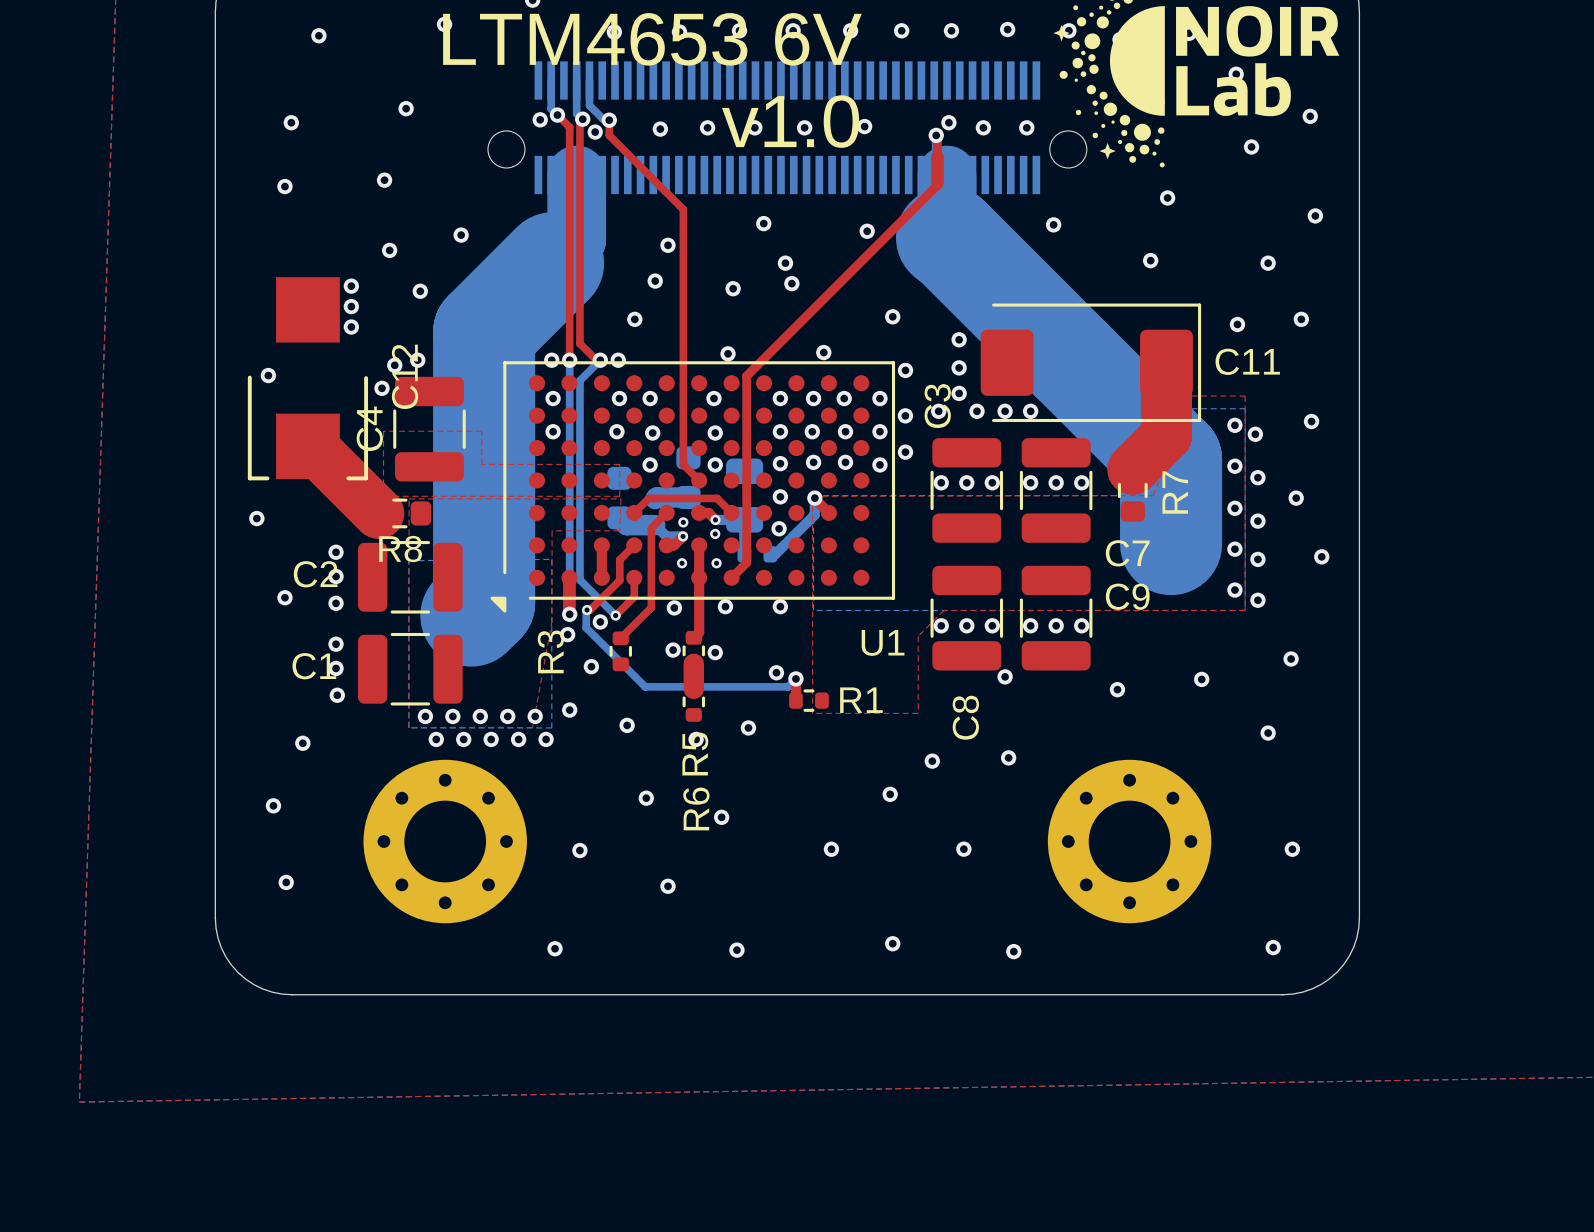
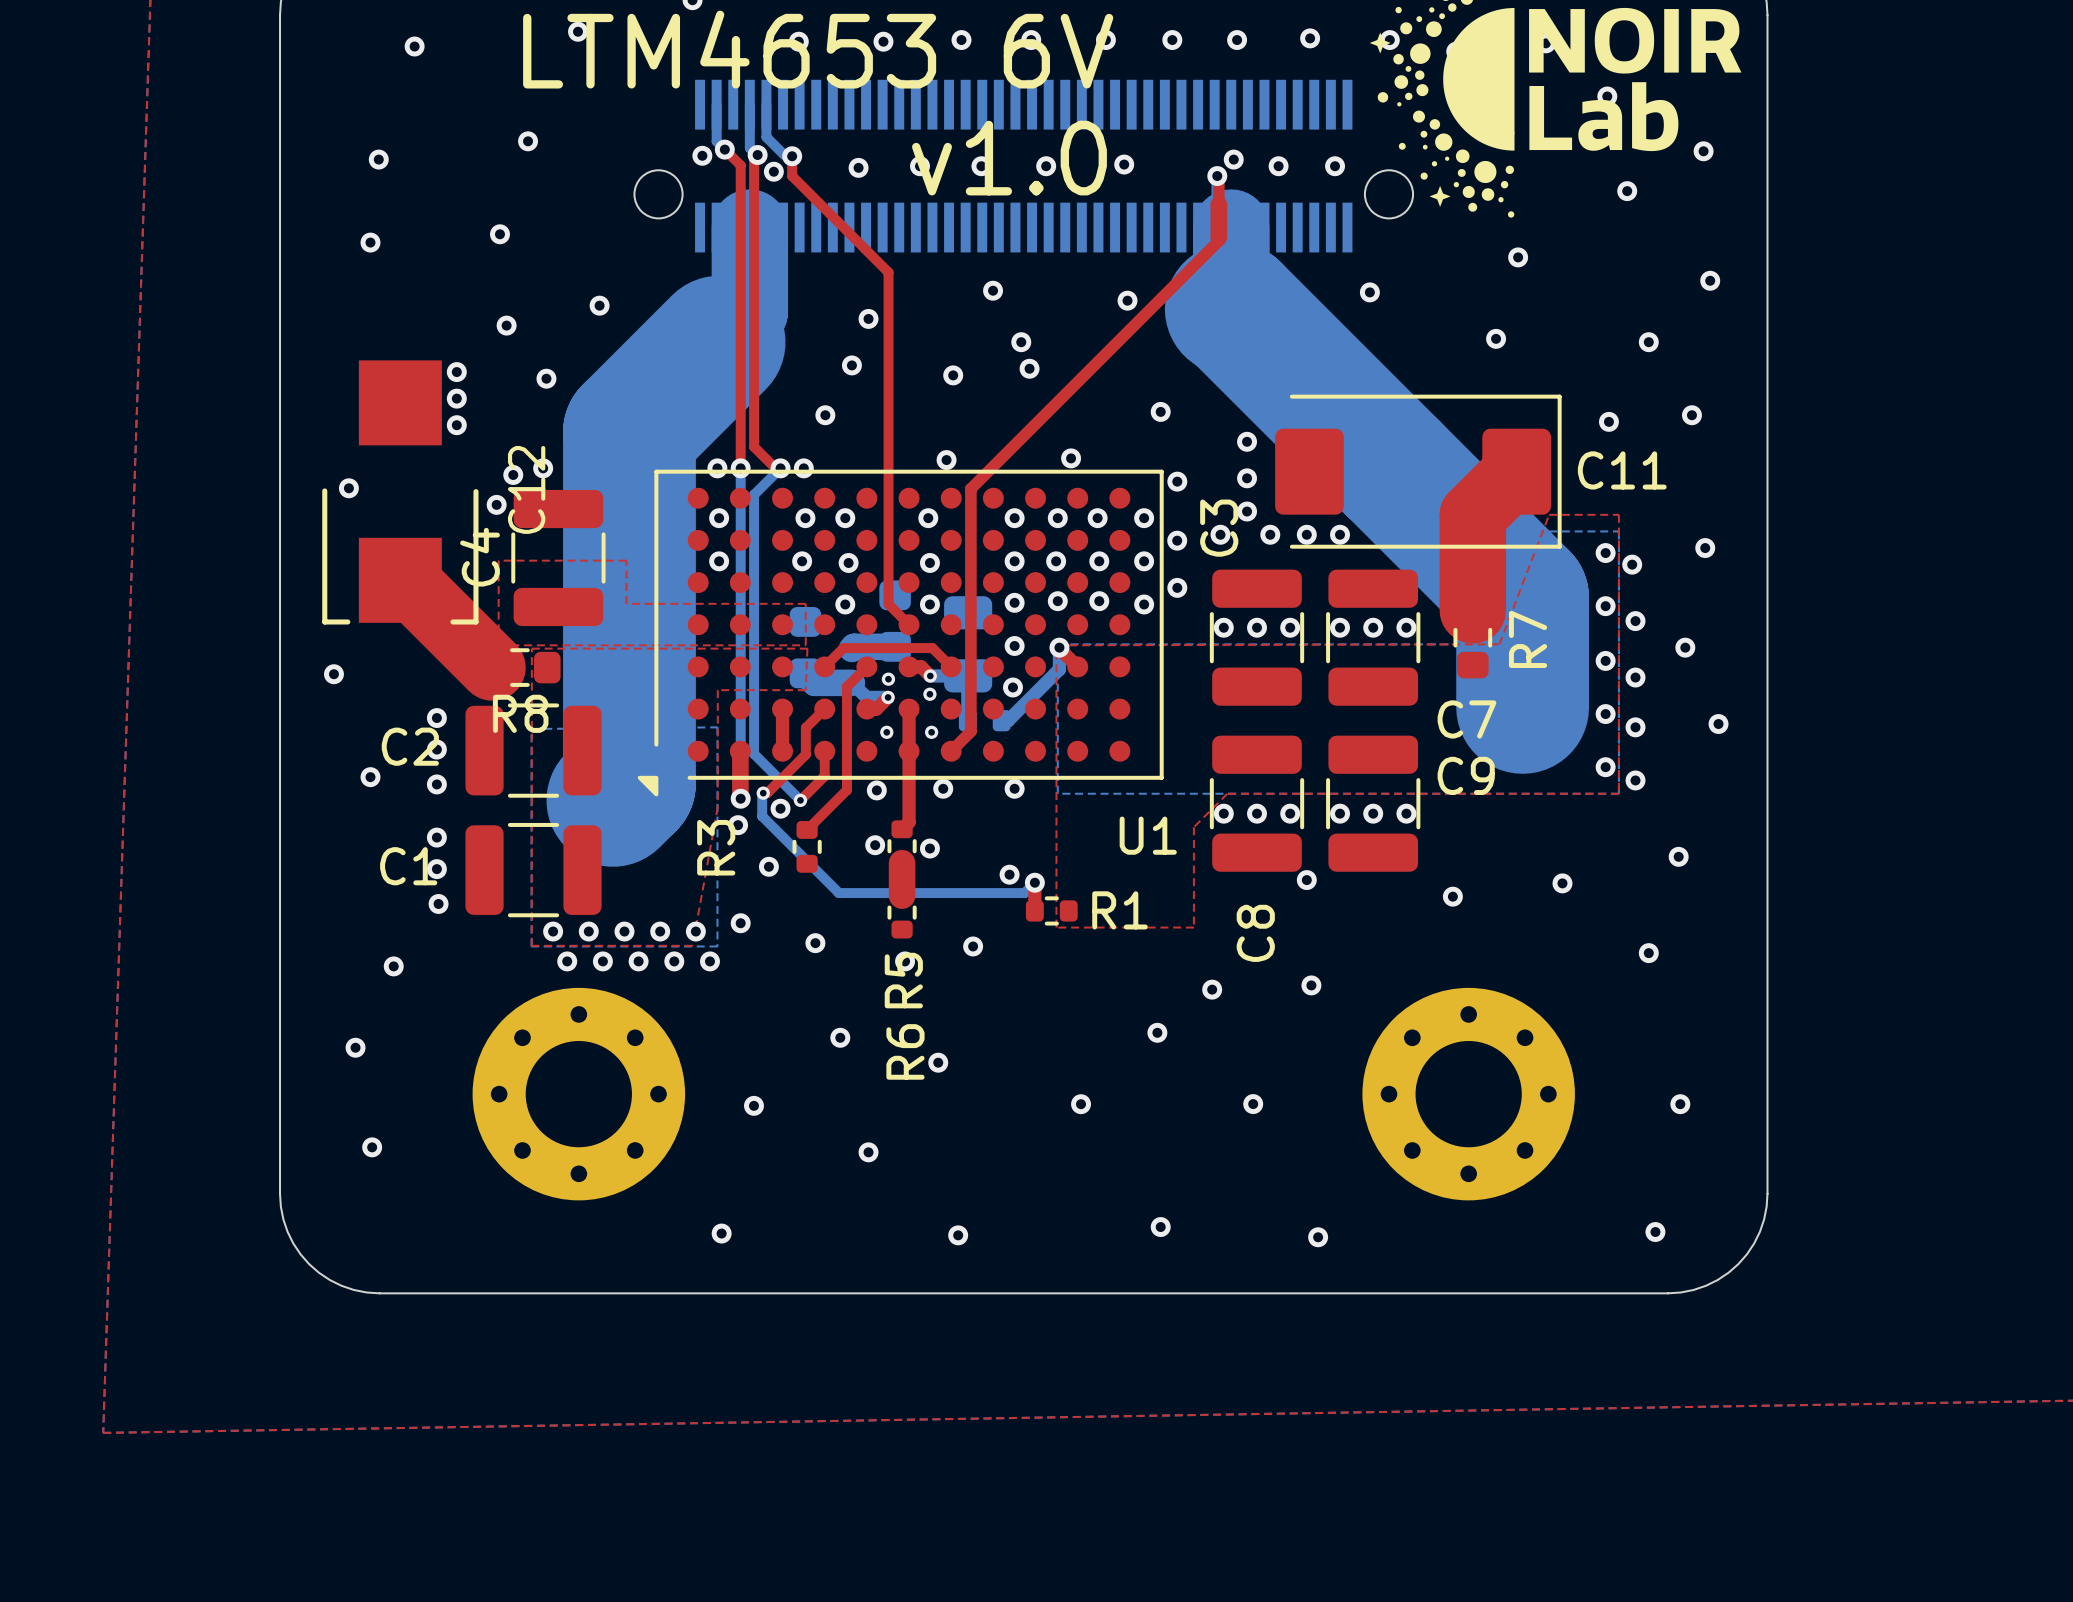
top track: (1166, 362) (1166, 435) (1132, 469) -> (1516, 471) (1472, 515) (1472, 610)

